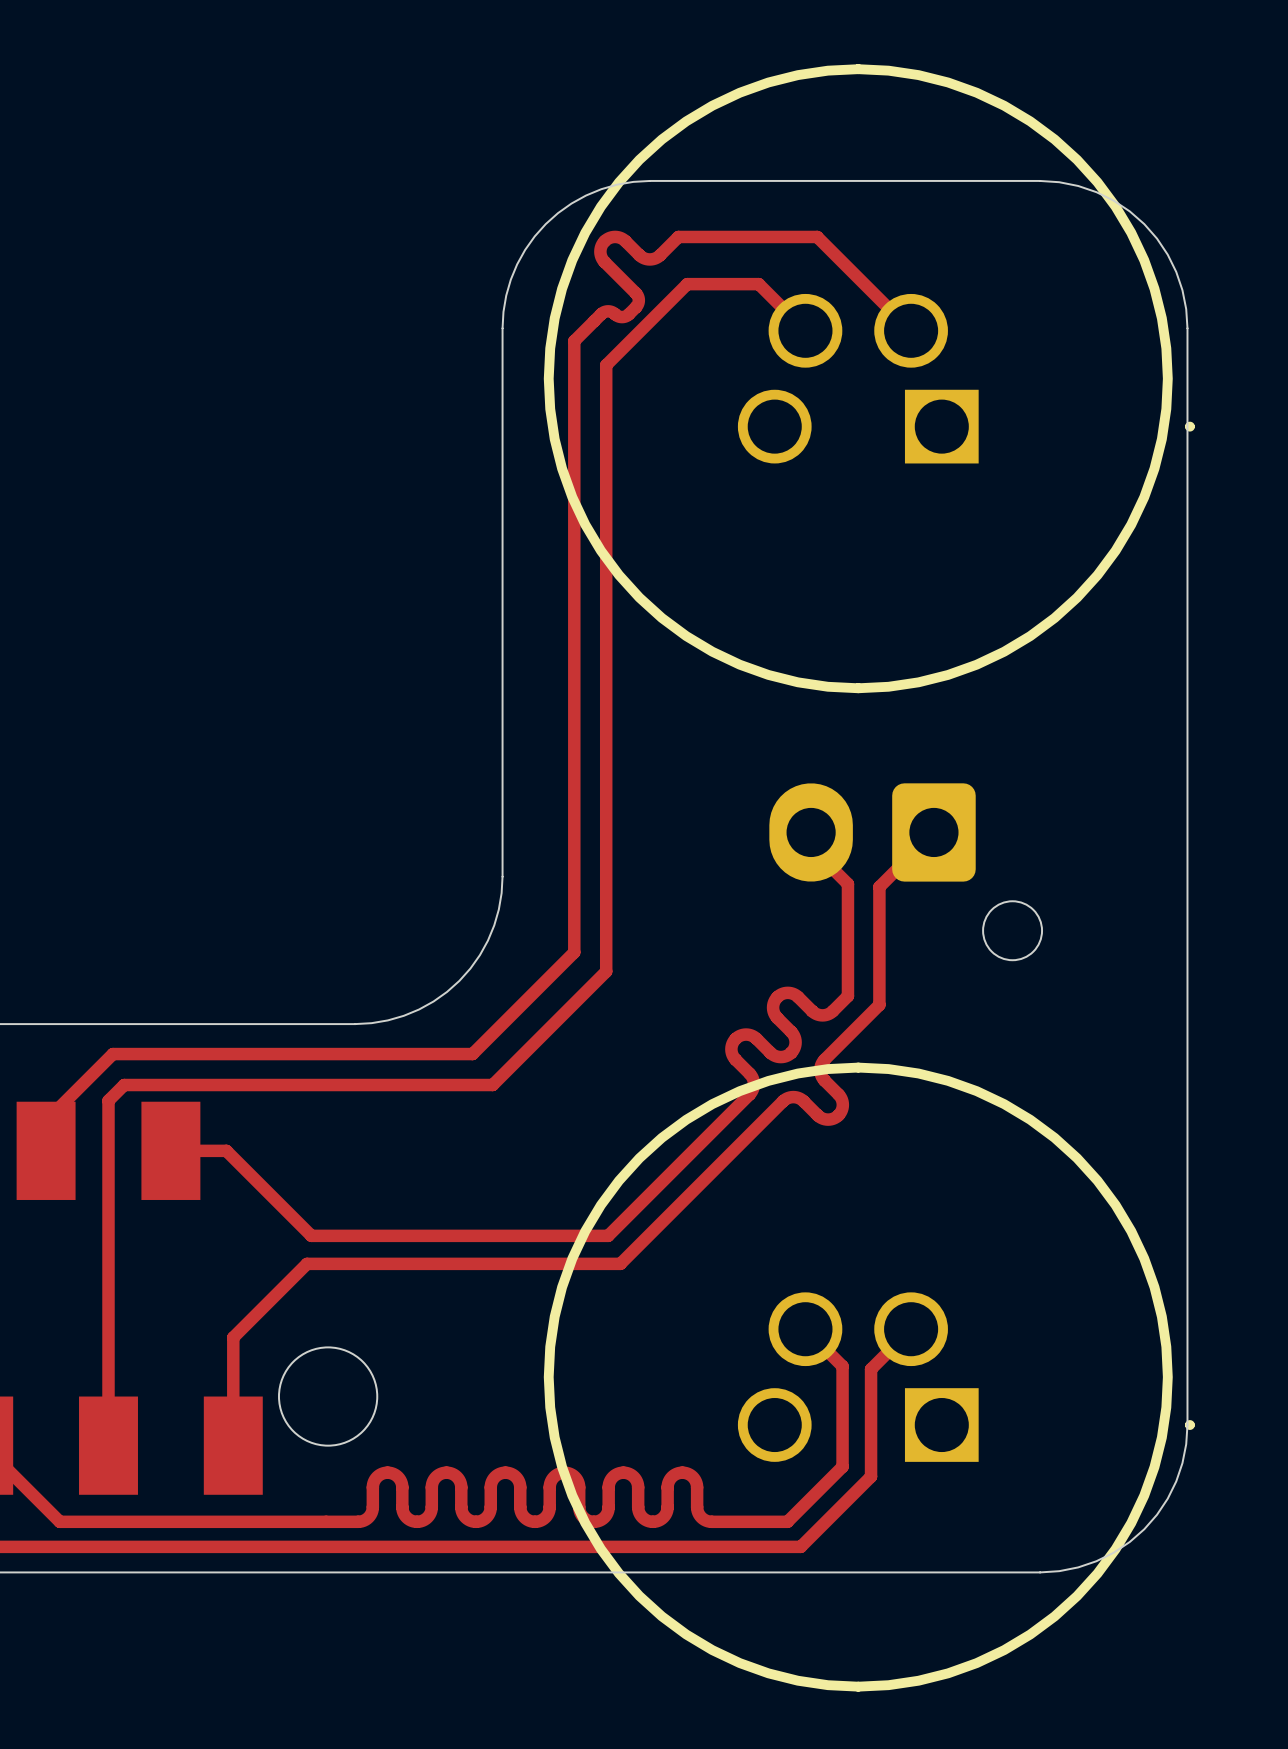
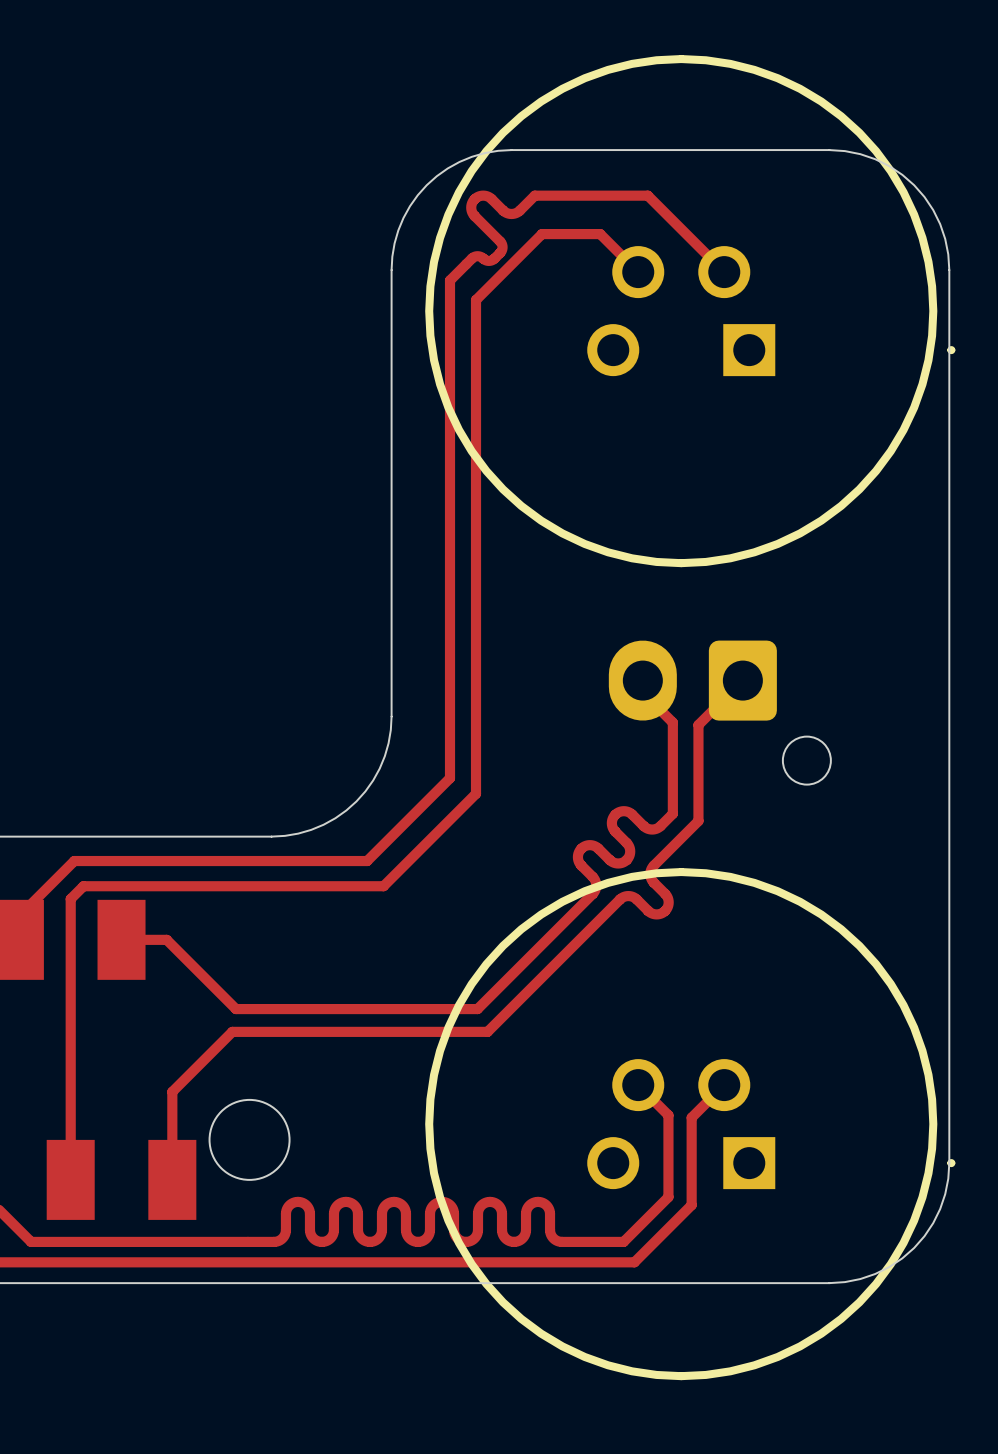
part footprint: [543, 64, 1195, 694] -> [425, 55, 956, 568]
part footprint: [543, 1062, 1195, 1692] -> [425, 868, 956, 1381]

